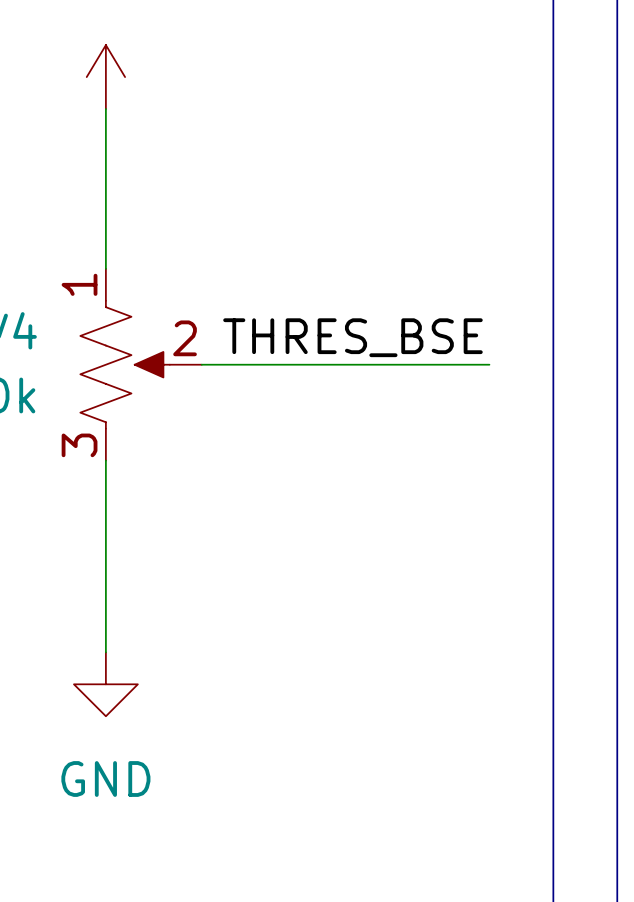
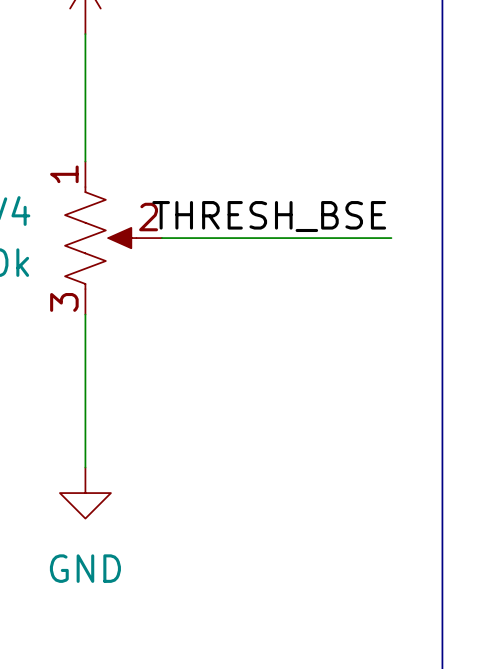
label: THRES_BSE (352, 337) -> THRESH_BSE (269, 216)

